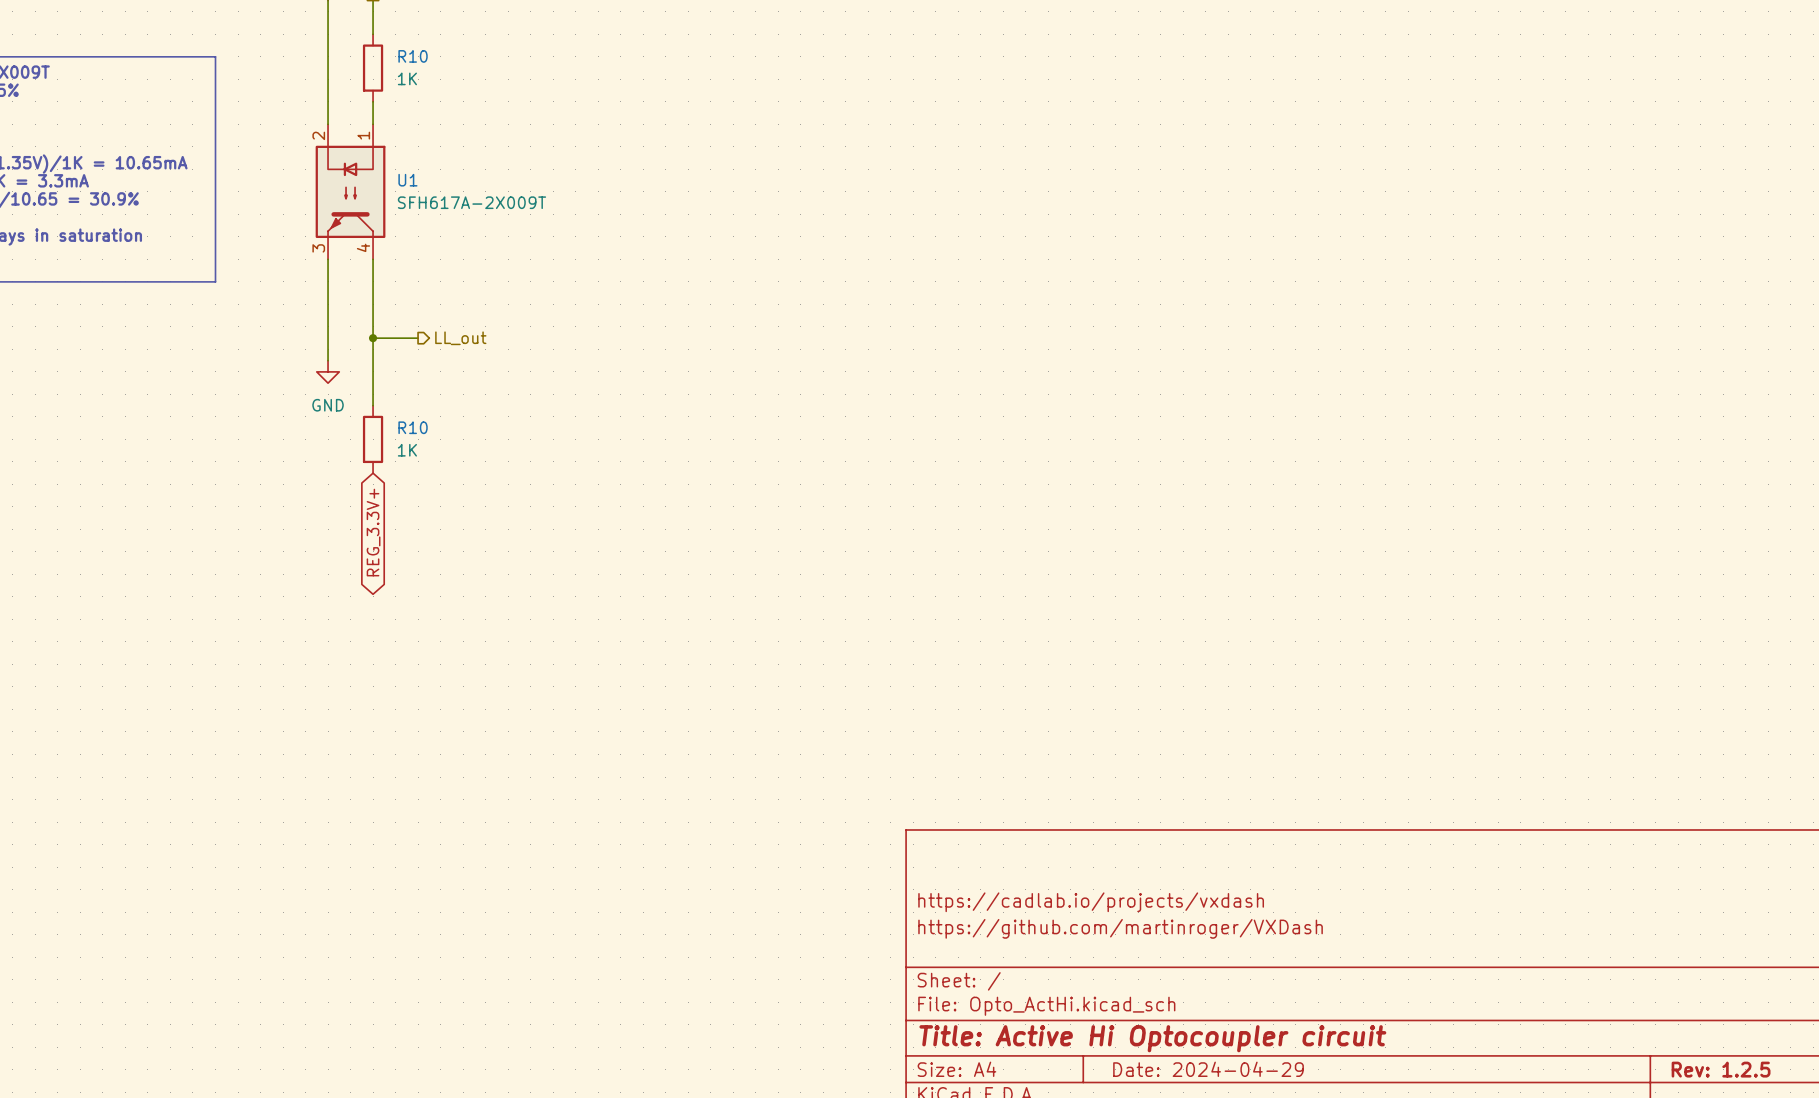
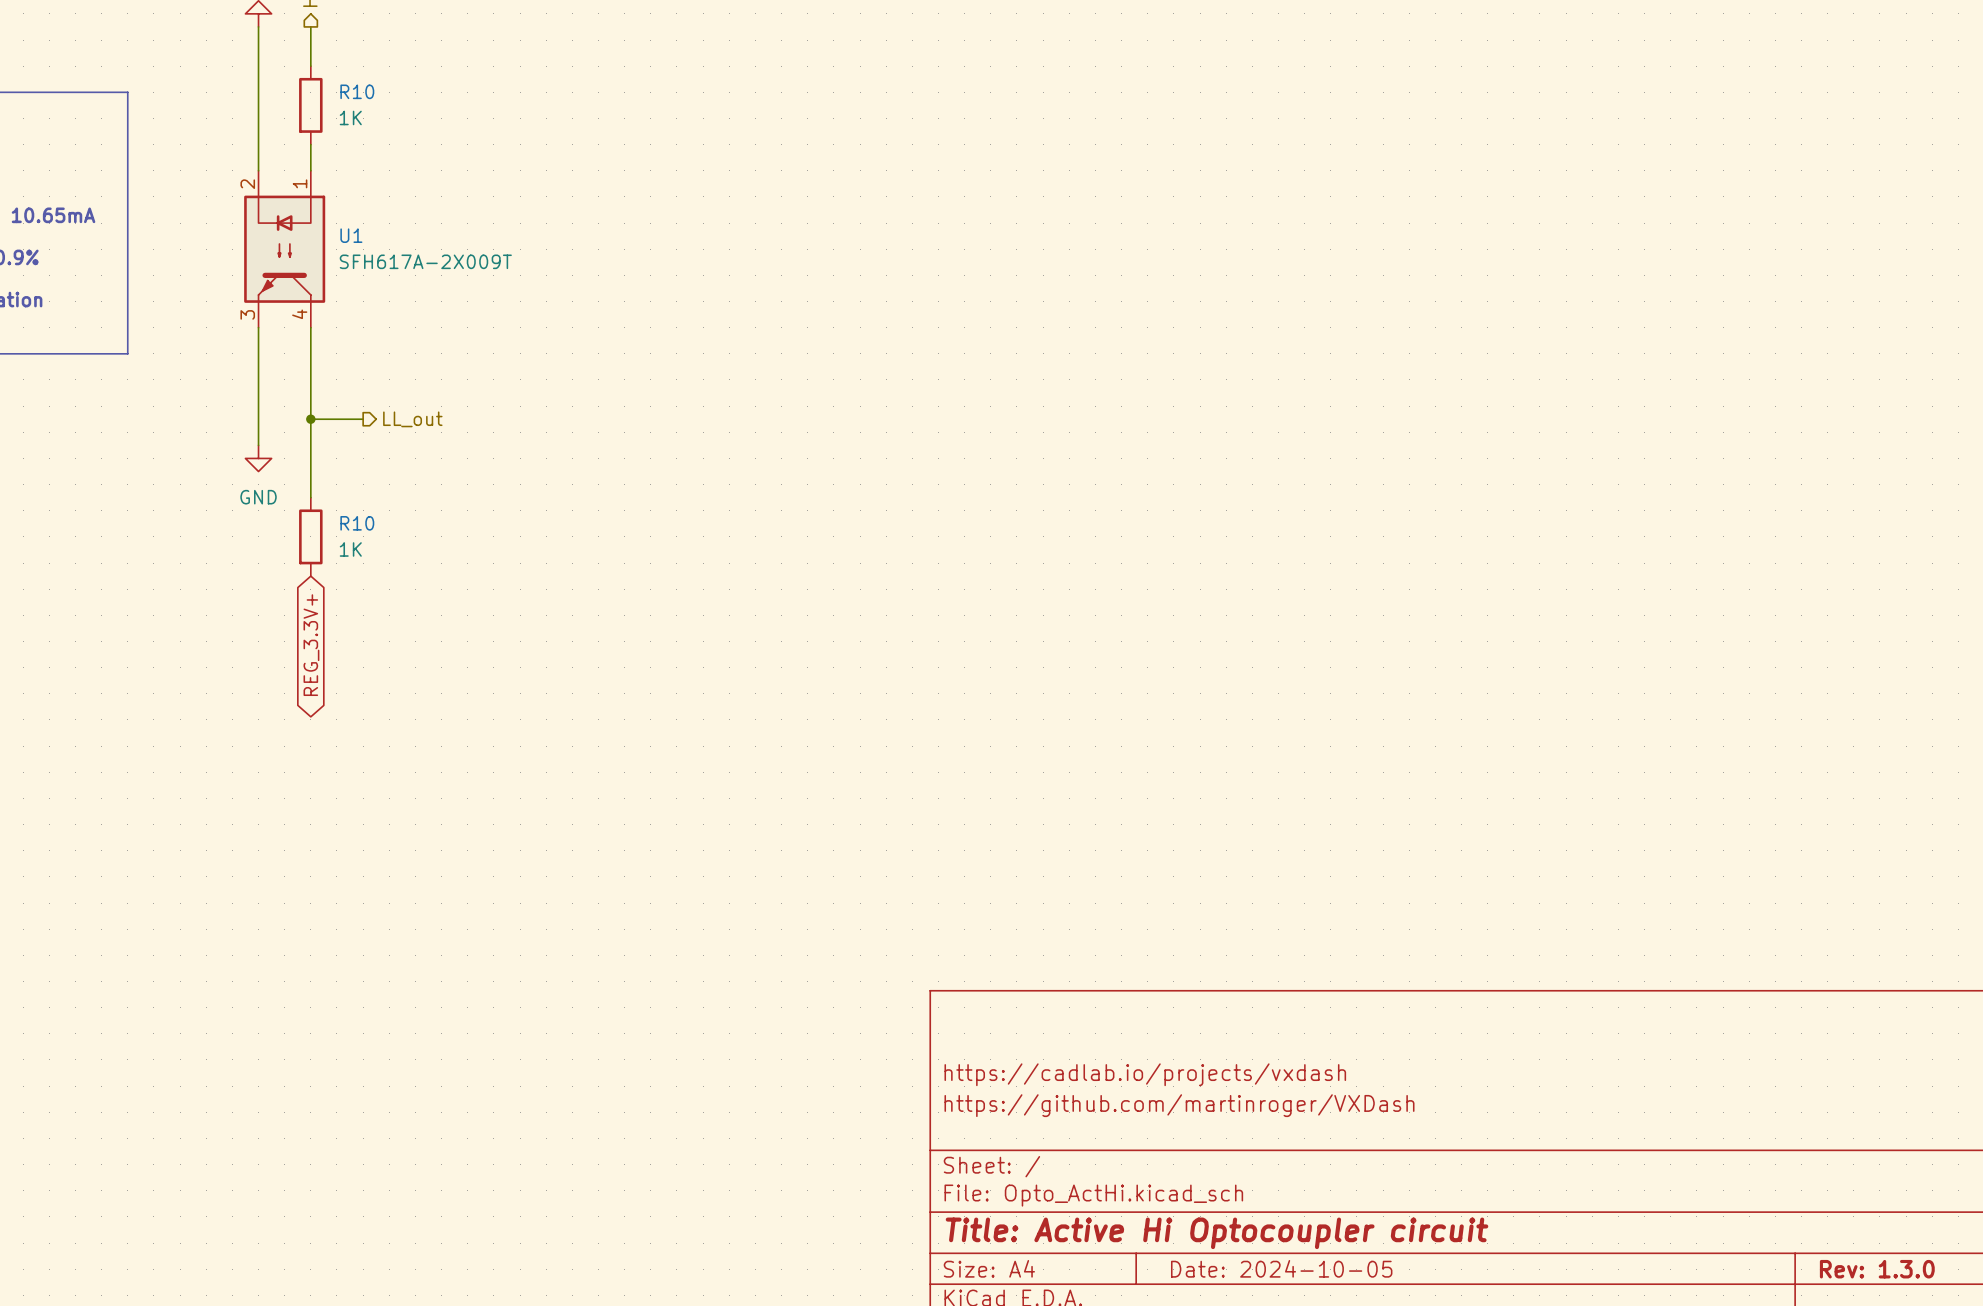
title block: Date: 2024-04-29 (1208, 1069) -> Date: 2024-10-05 (1281, 1268)
title block: Rev: 1.2.5 (1721, 1069) -> Rev: 1.3.0 (1877, 1269)

